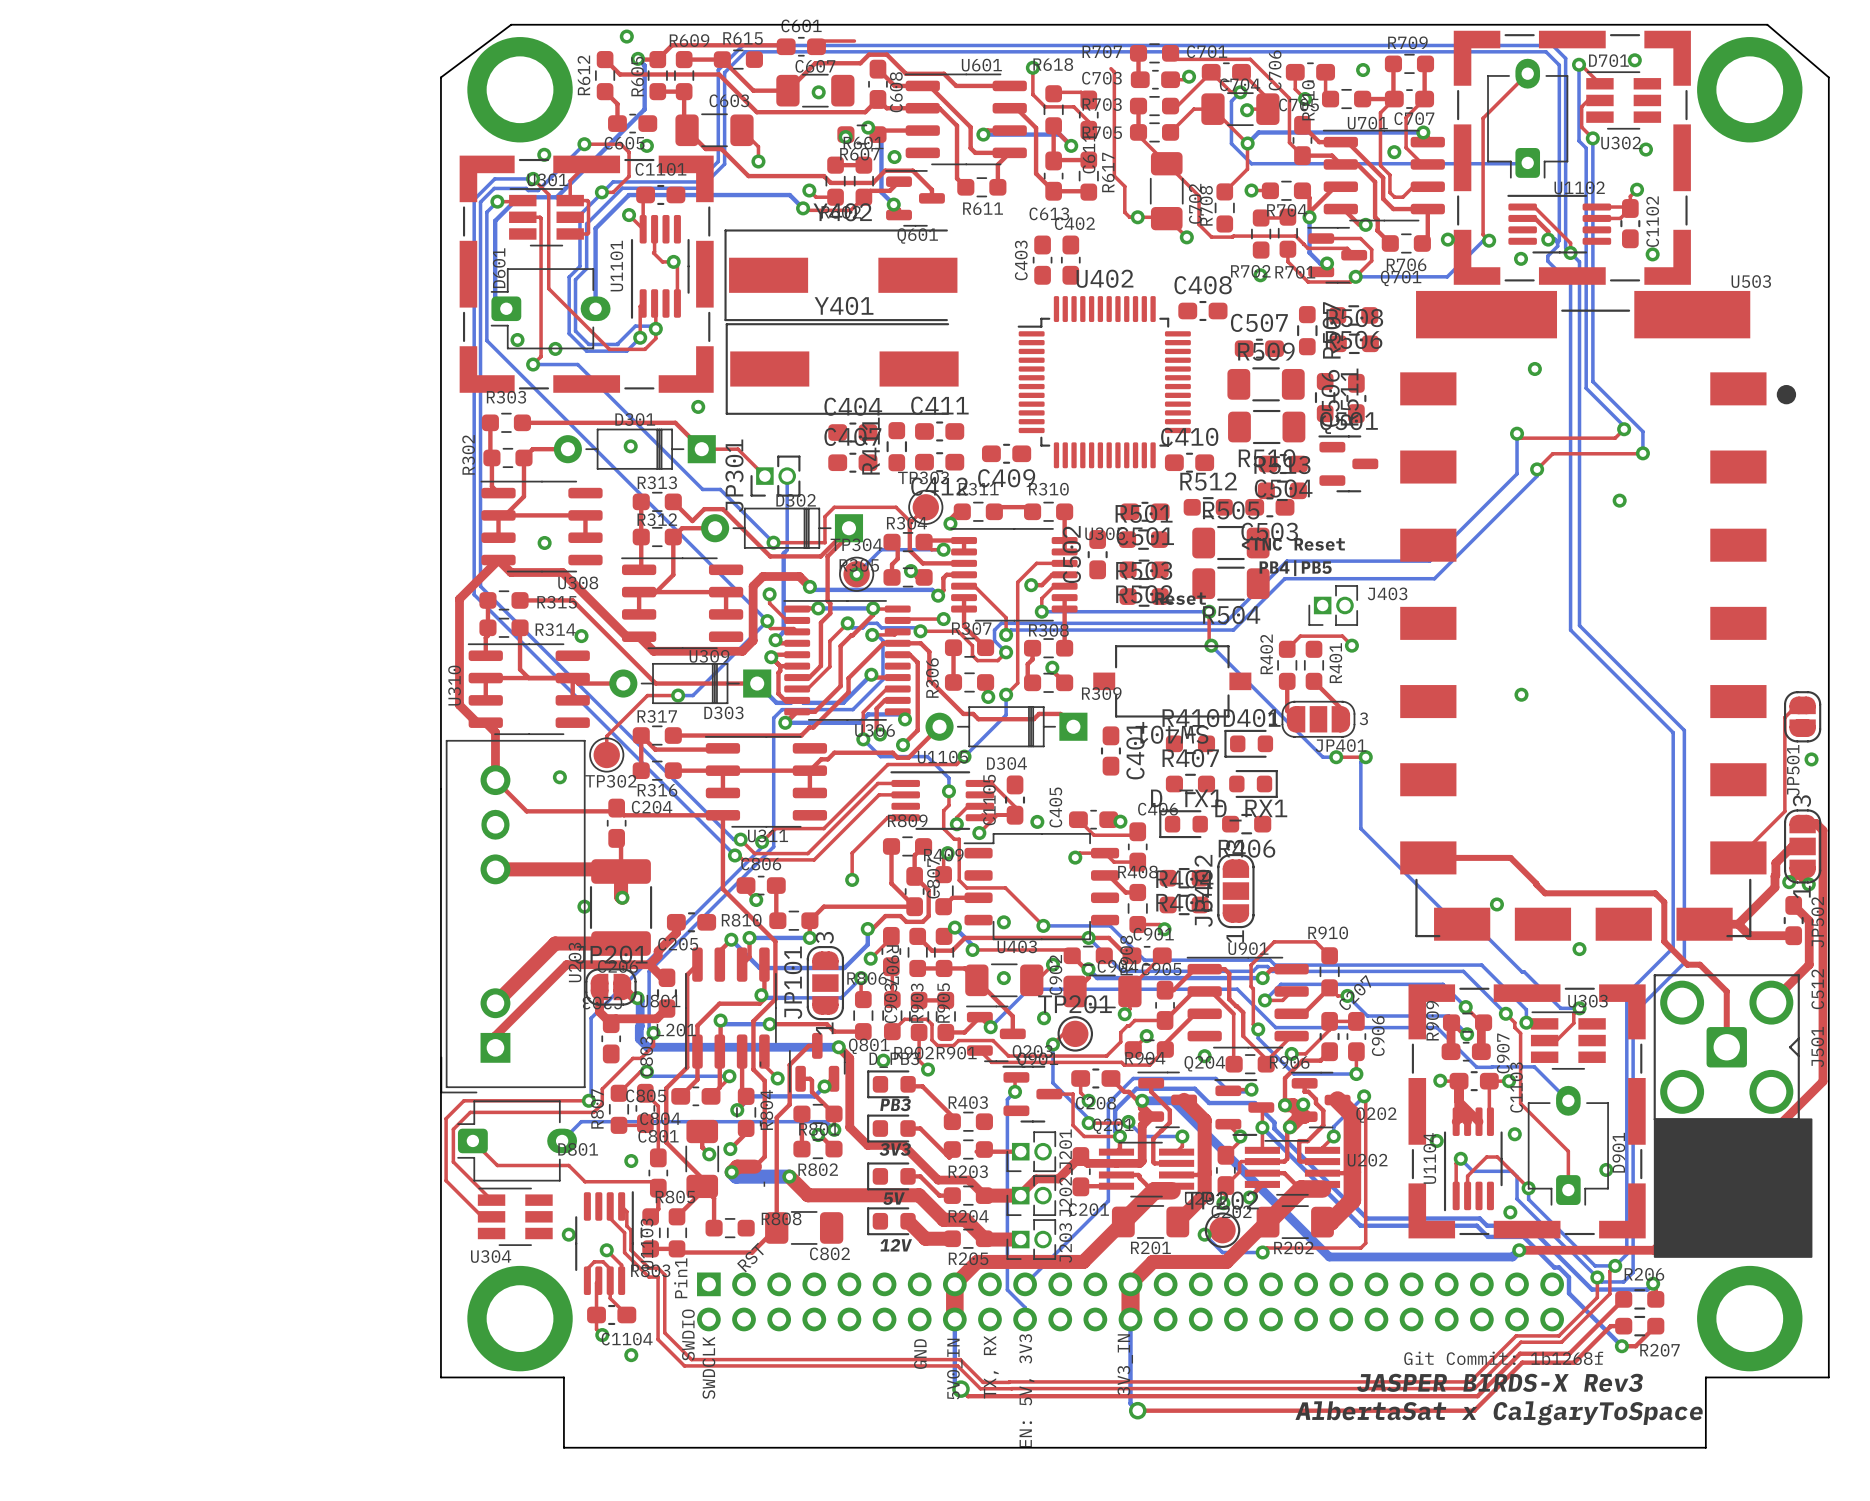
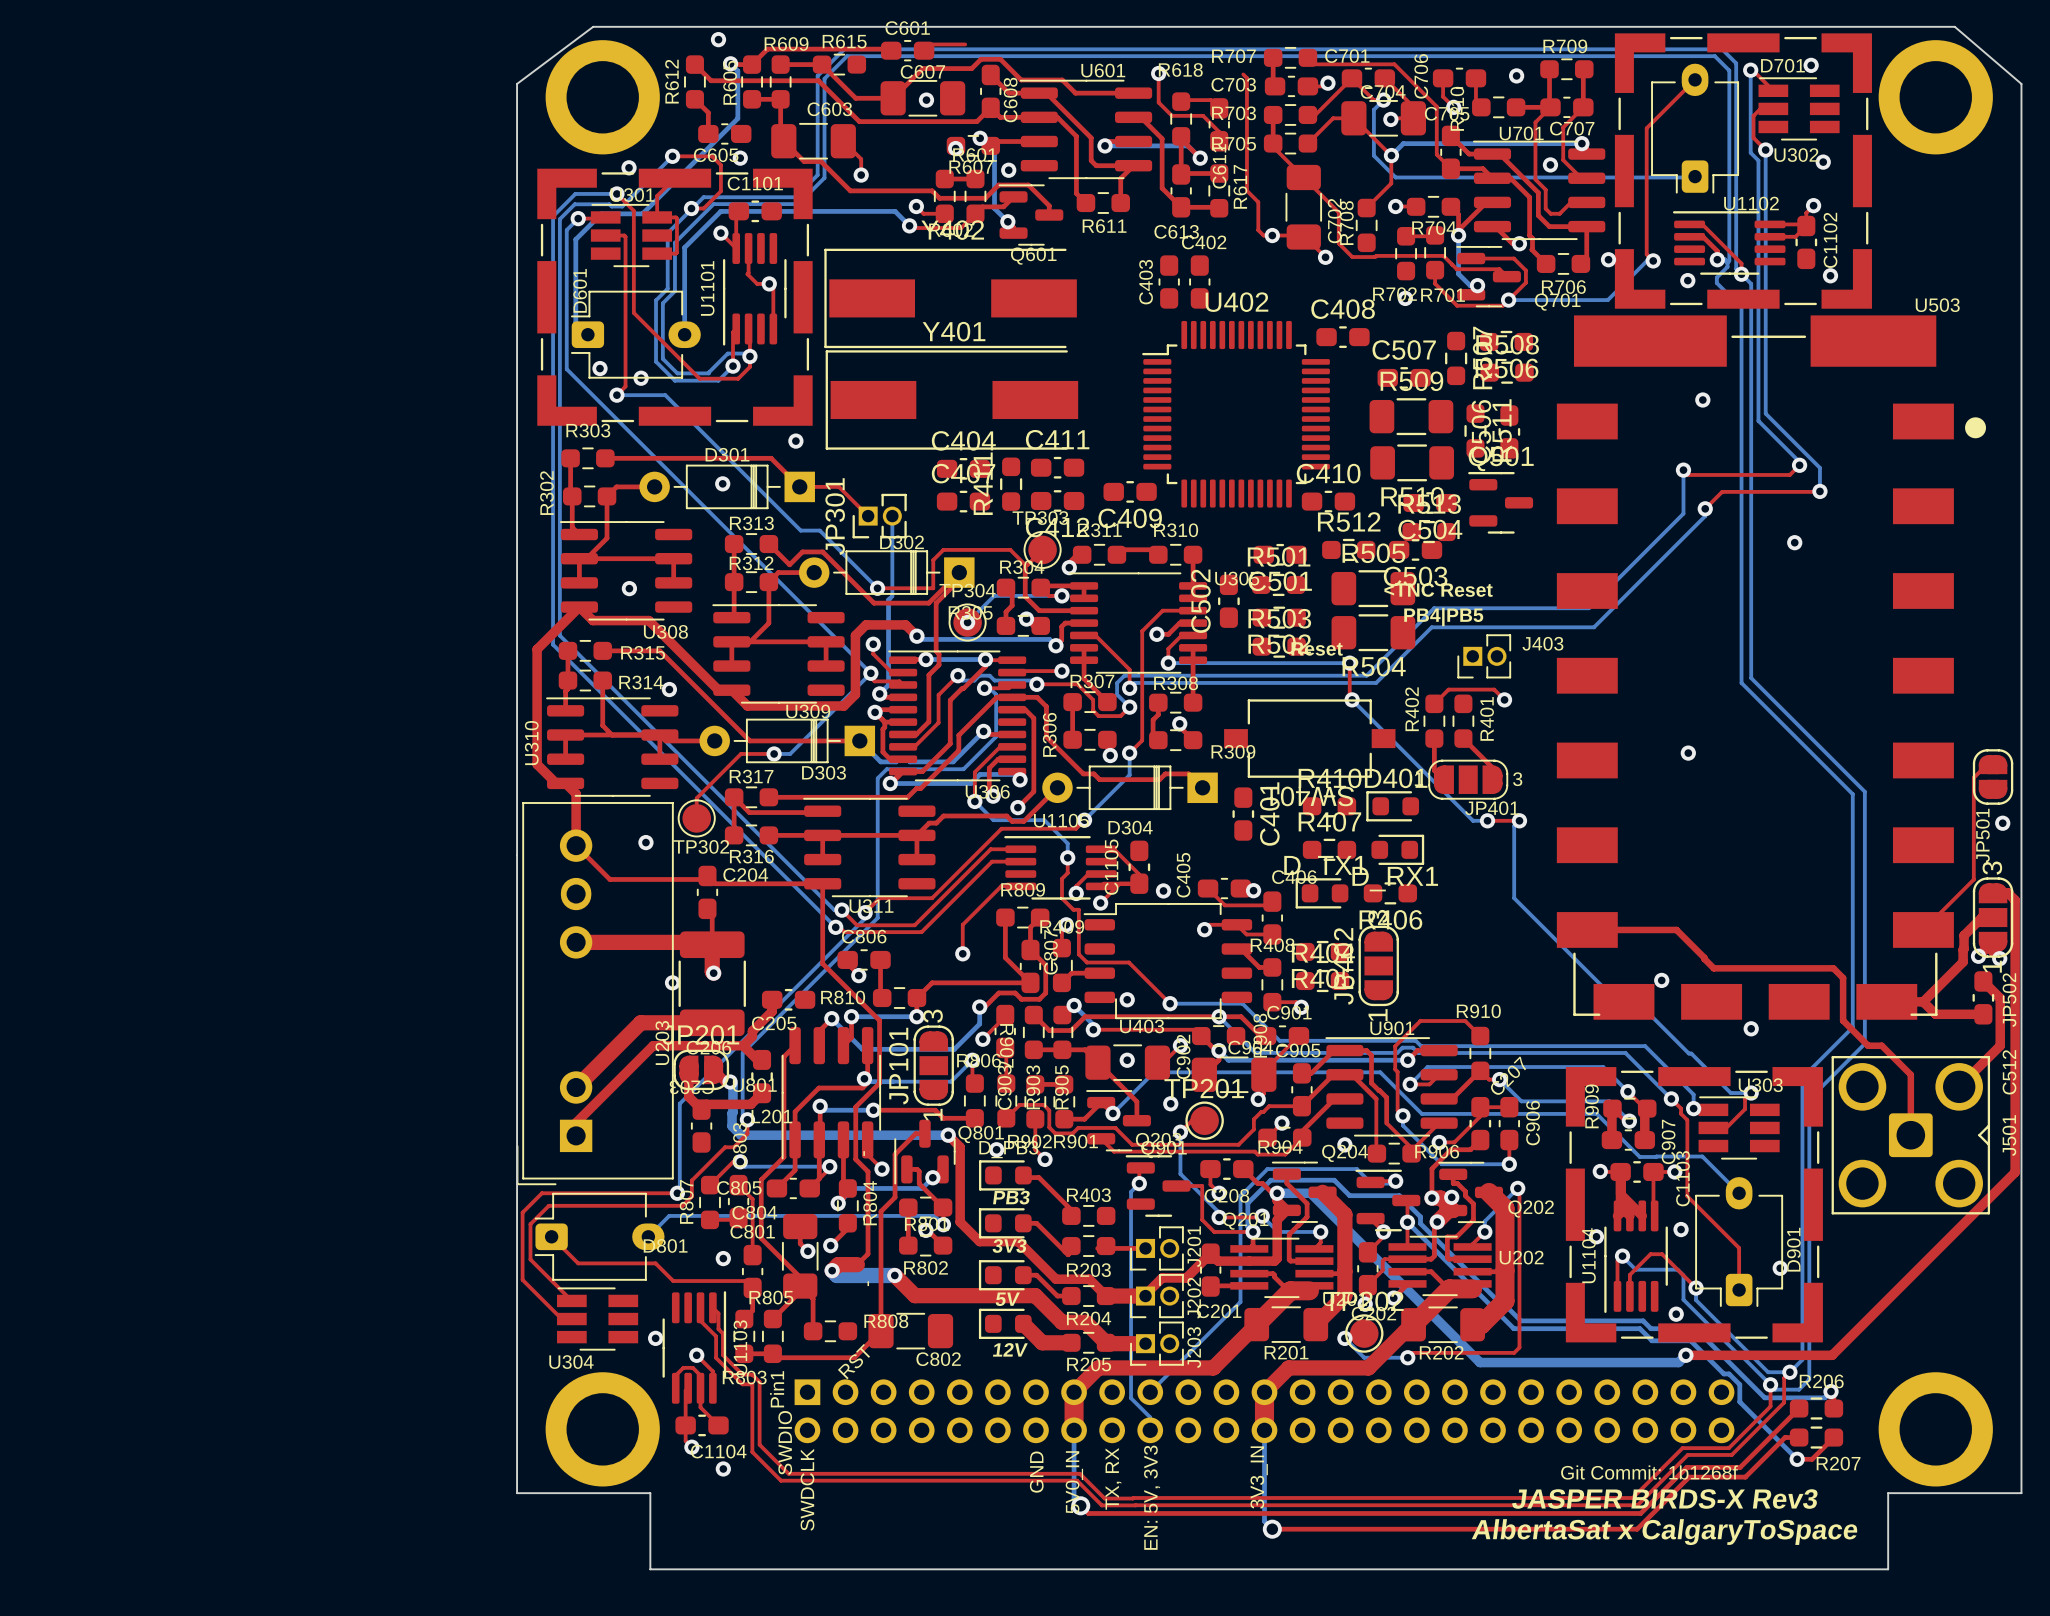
drawing: [1653, 1118, 1813, 1258] -> none

